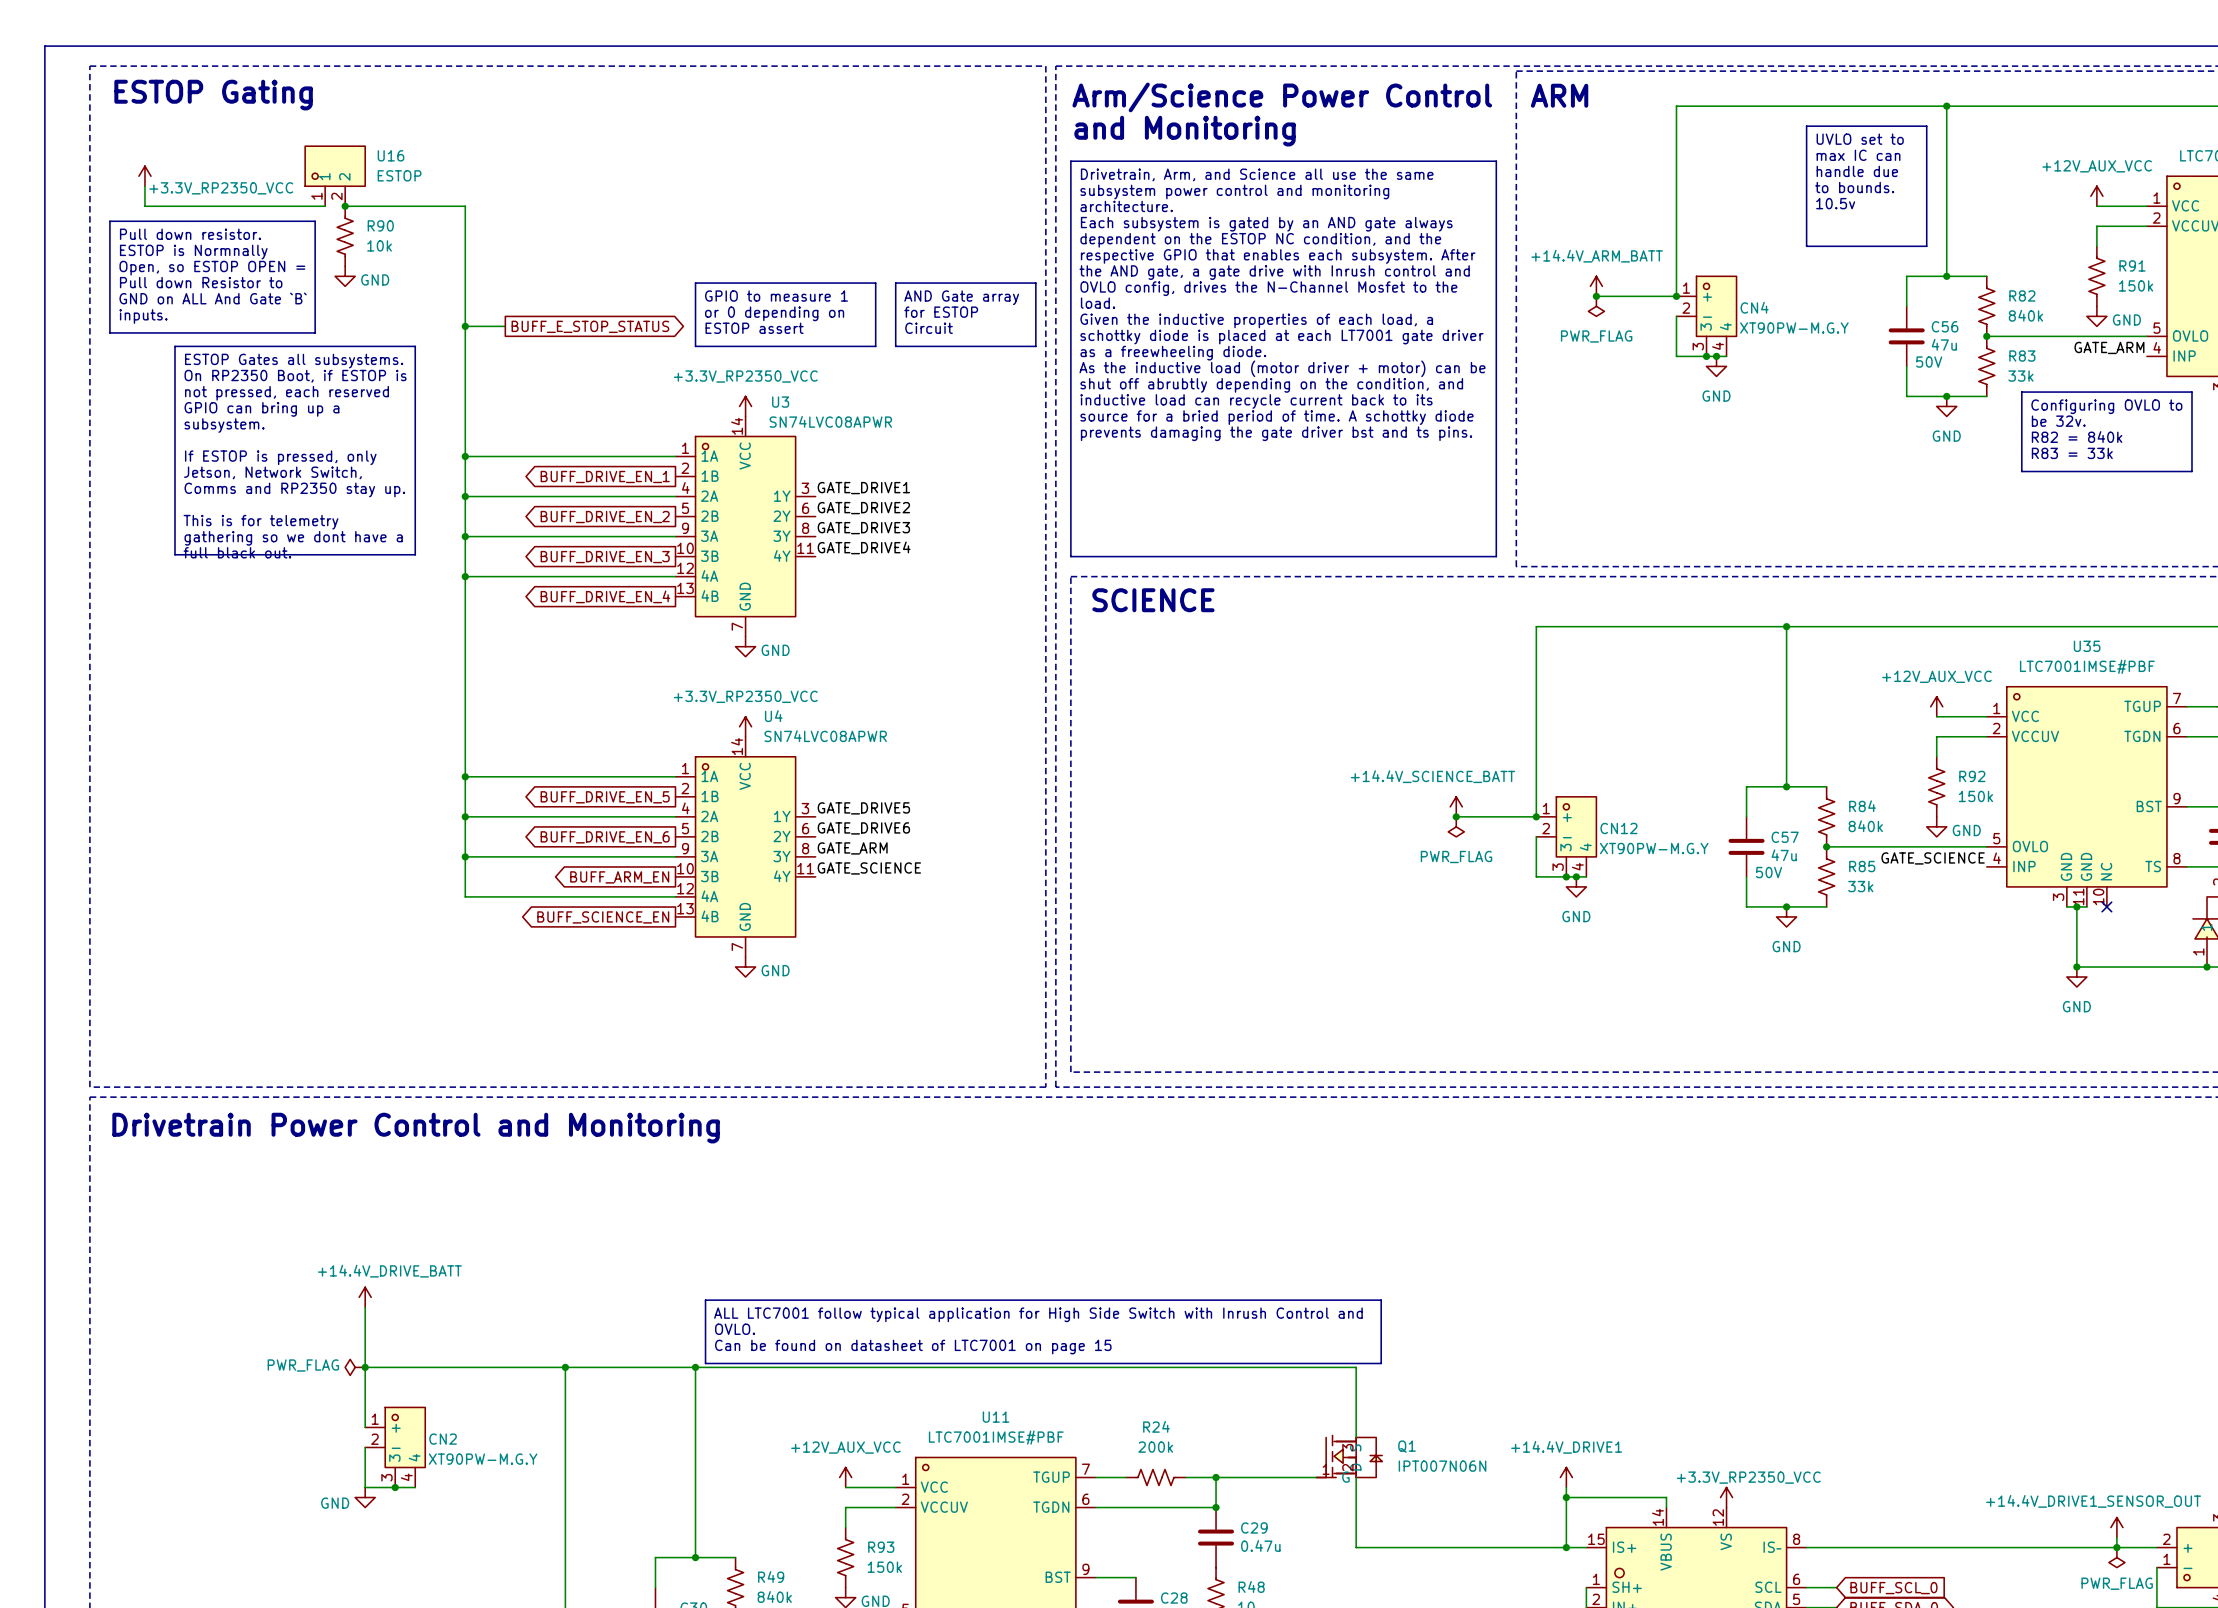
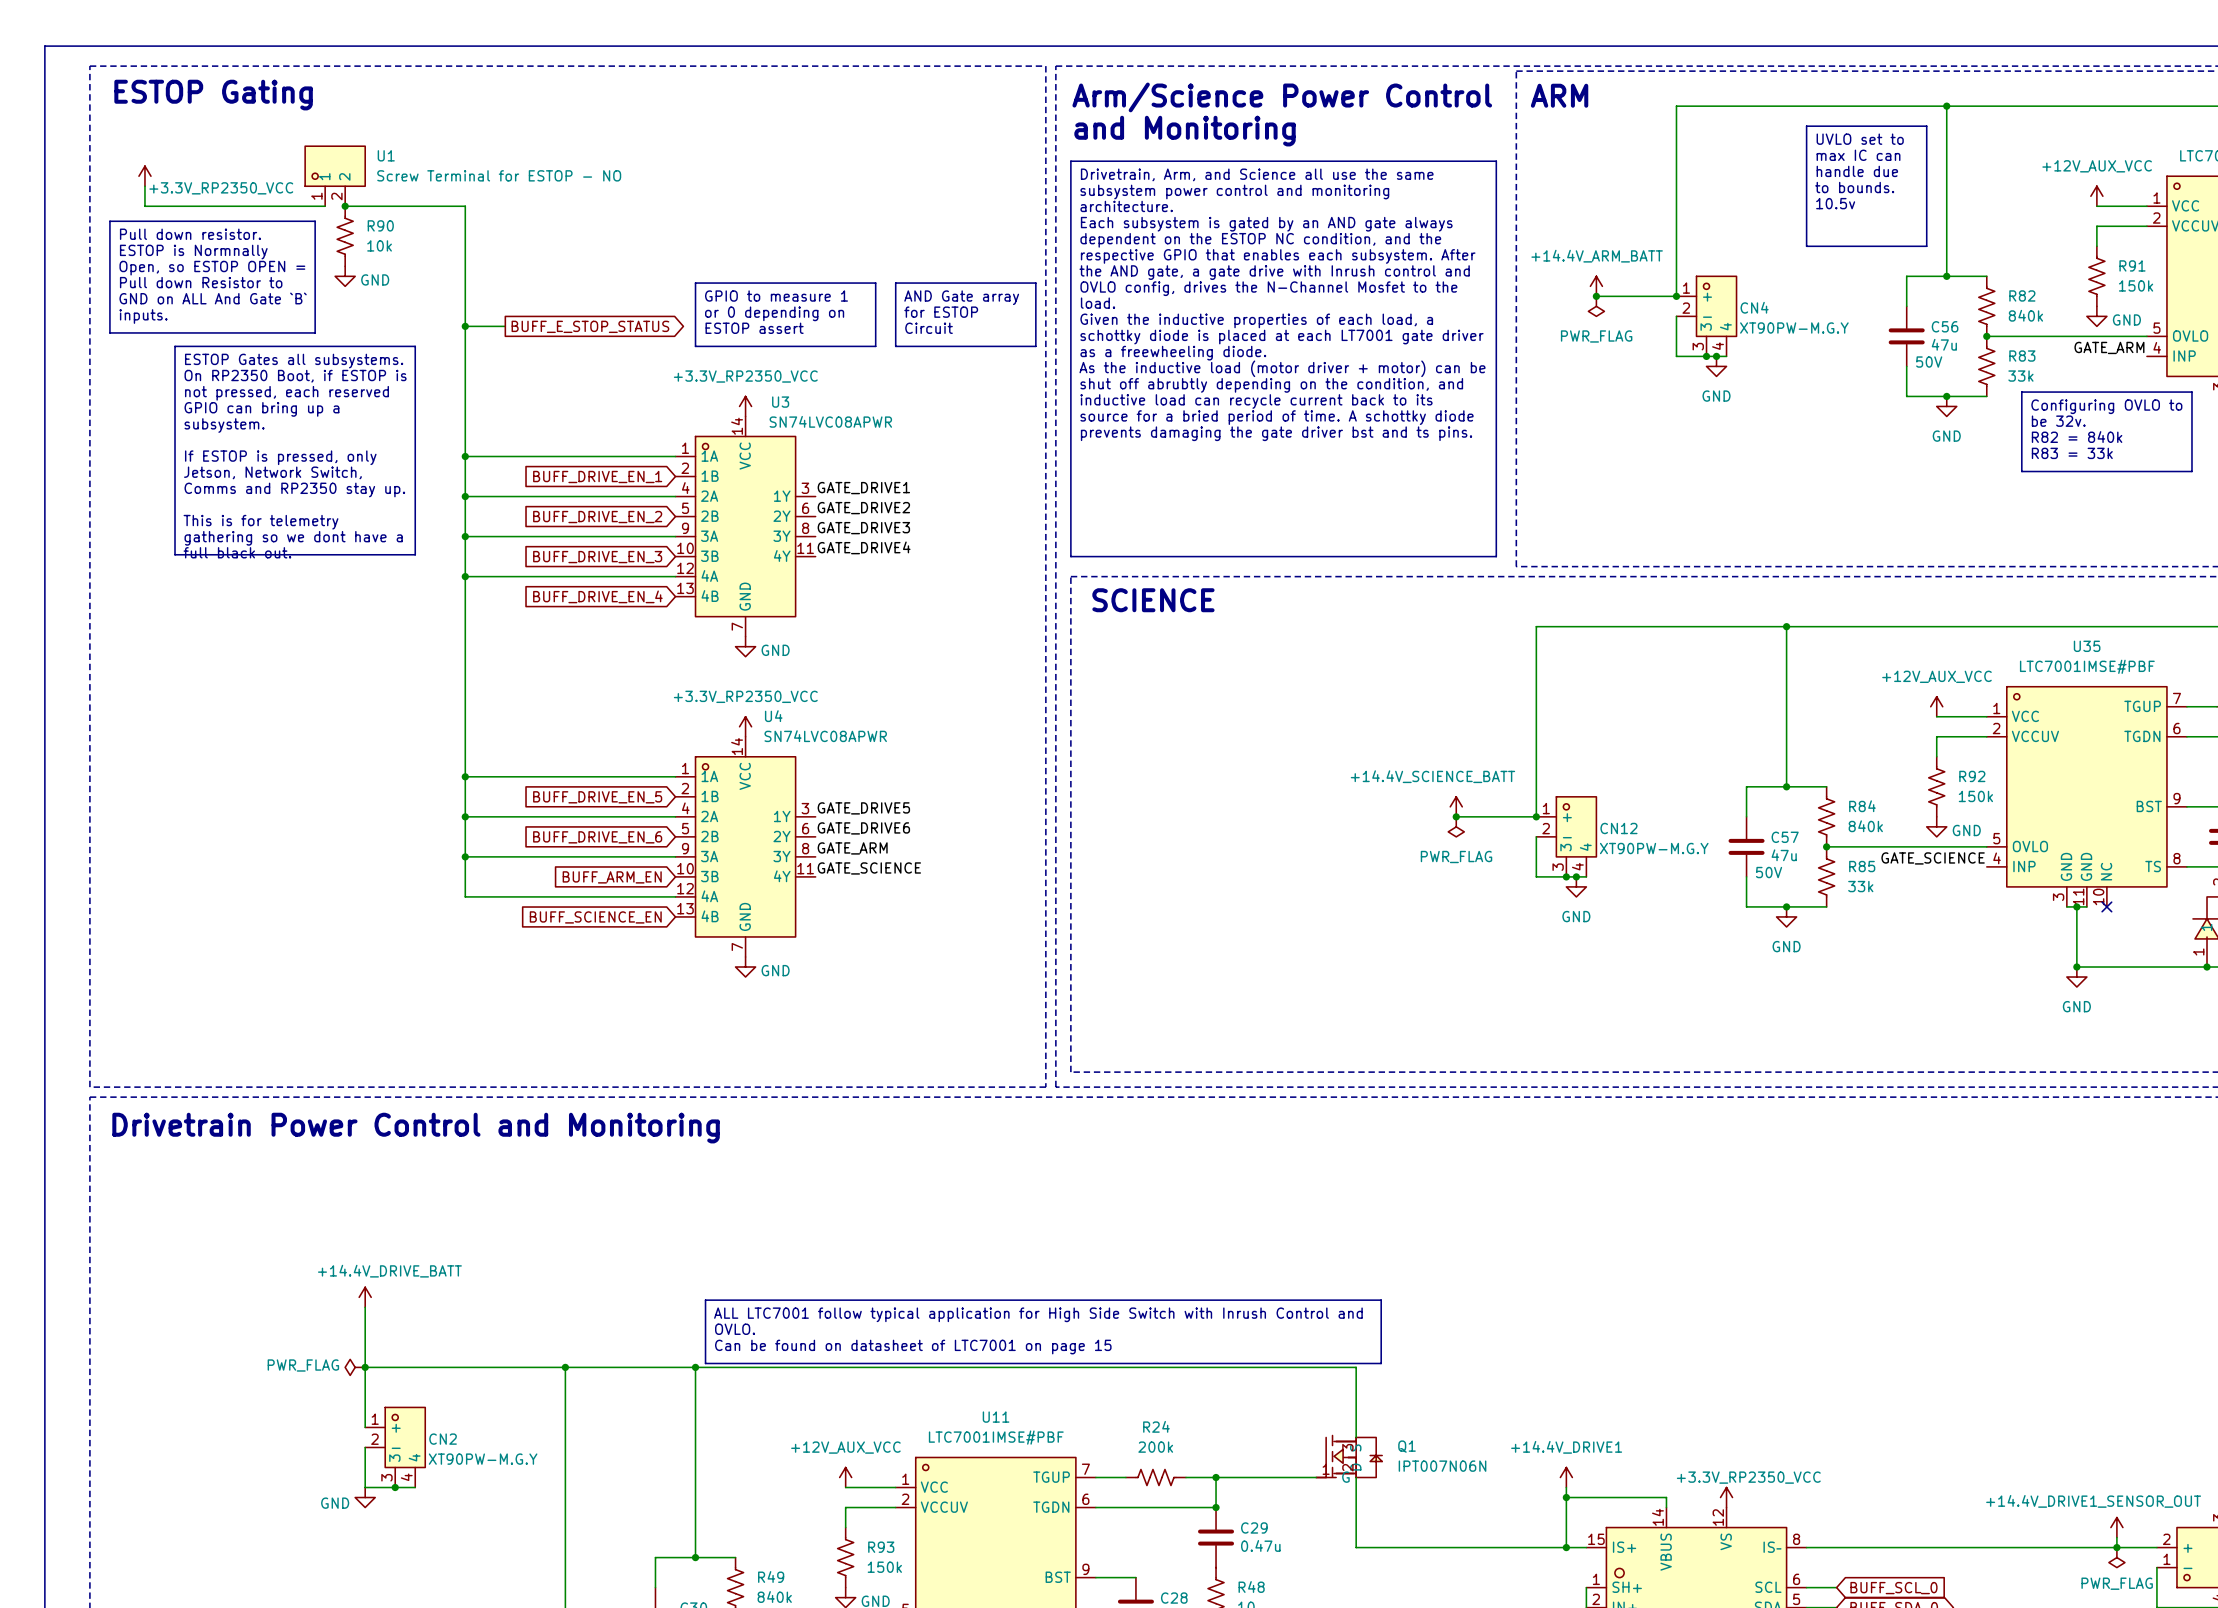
U16 name: U16 (391, 155) -> U1 (386, 155)
U16 value: ESTOP (399, 175) -> Screw Terminal for ESTOP - NO (499, 175)
global label shape: output (605, 477) -> input (597, 477)
global label shape: output (605, 517) -> input (597, 517)
global label shape: output (605, 557) -> input (597, 557)
global label shape: output (605, 596) -> input (597, 596)
global label shape: output (605, 797) -> input (597, 797)
global label shape: output (605, 837) -> input (597, 837)
global label shape: output (619, 877) -> input (612, 877)
global label shape: output (603, 917) -> input (595, 917)

